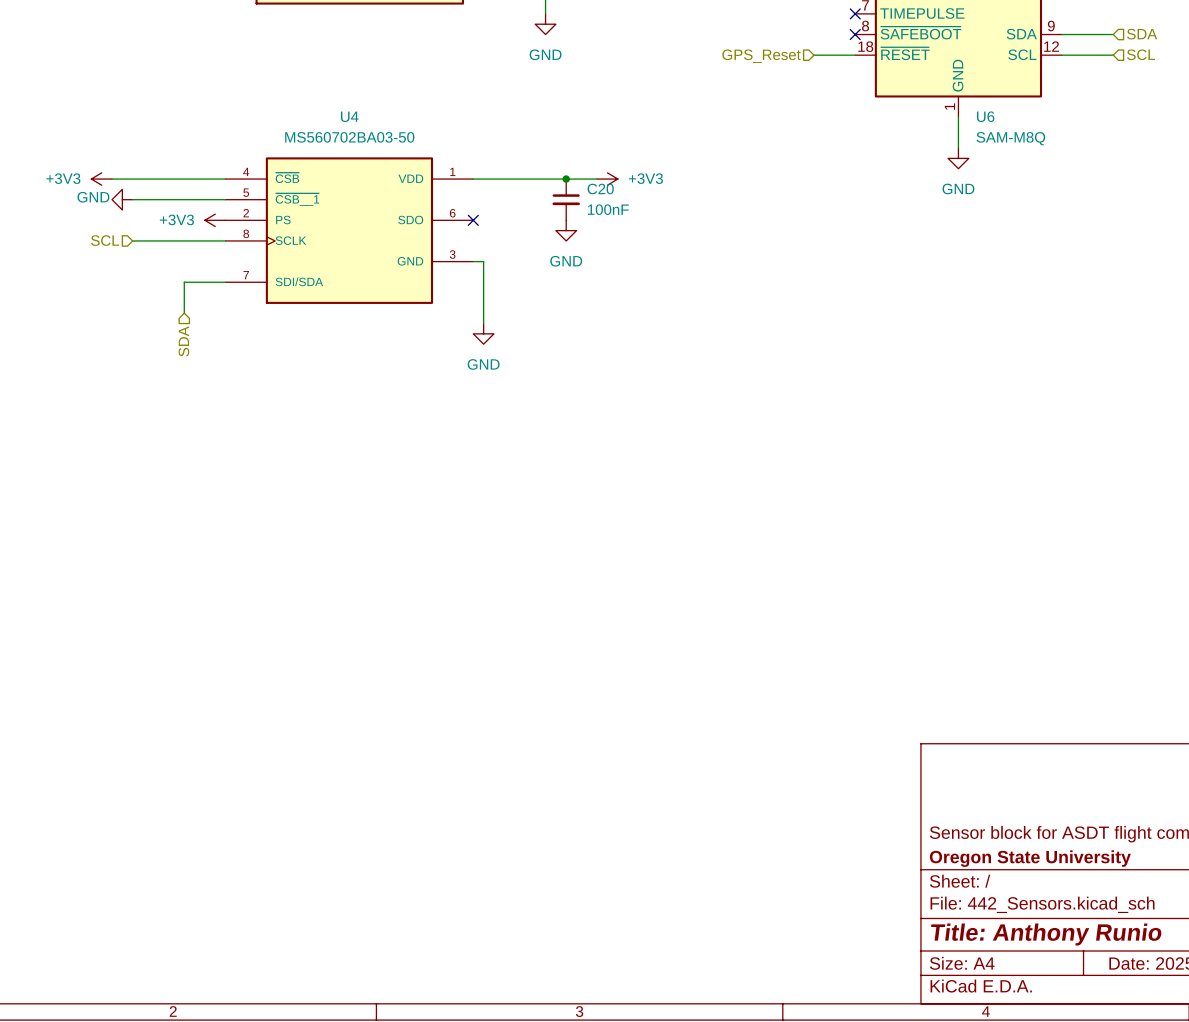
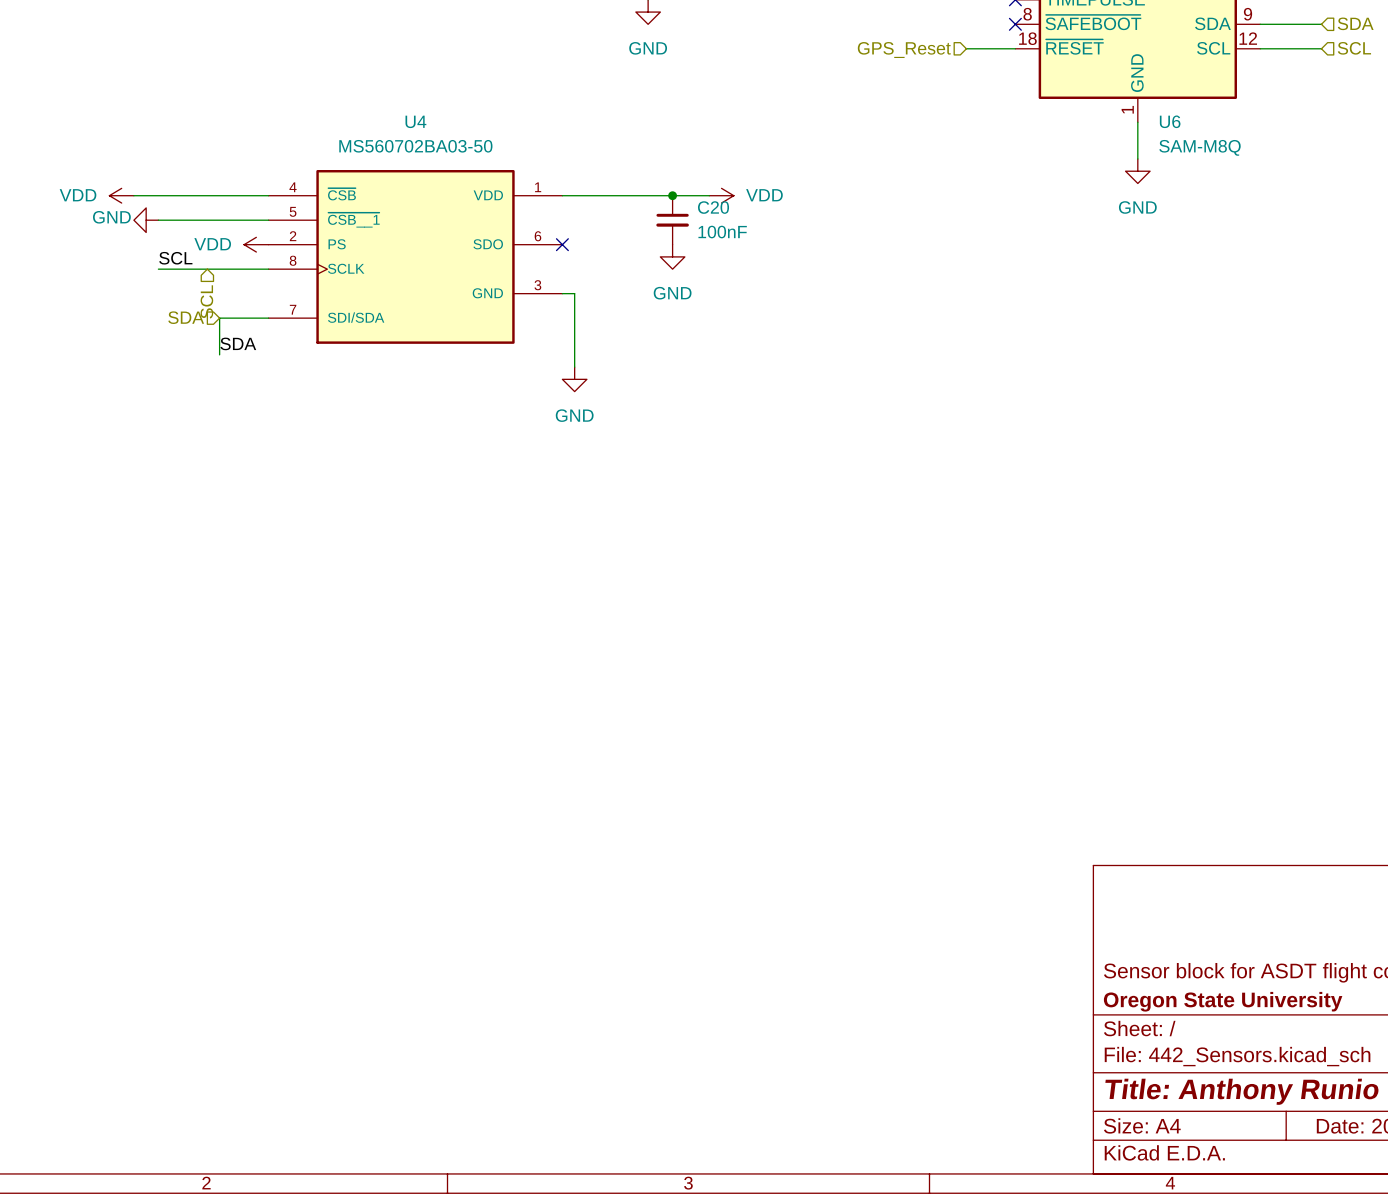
power symbol: +3V3 (101, 179) -> VDD (121, 195)
power symbol: +3V3 (607, 179) -> VDD (721, 195)
power symbol: +3V3 (215, 220) -> VDD (256, 244)
label: none -> SCL (175, 258)
hierarchical label rotation: 0° (105, 240) -> 90° counterclockwise (206, 301)
hierarchical label position: SCL (105, 240) -> SCL (206, 301)
label: none -> SDA (238, 343)
hierarchical label rotation: 0° (183, 341) -> 90° clockwise (186, 317)
hierarchical label position: SDA (183, 341) -> SDA (186, 317)

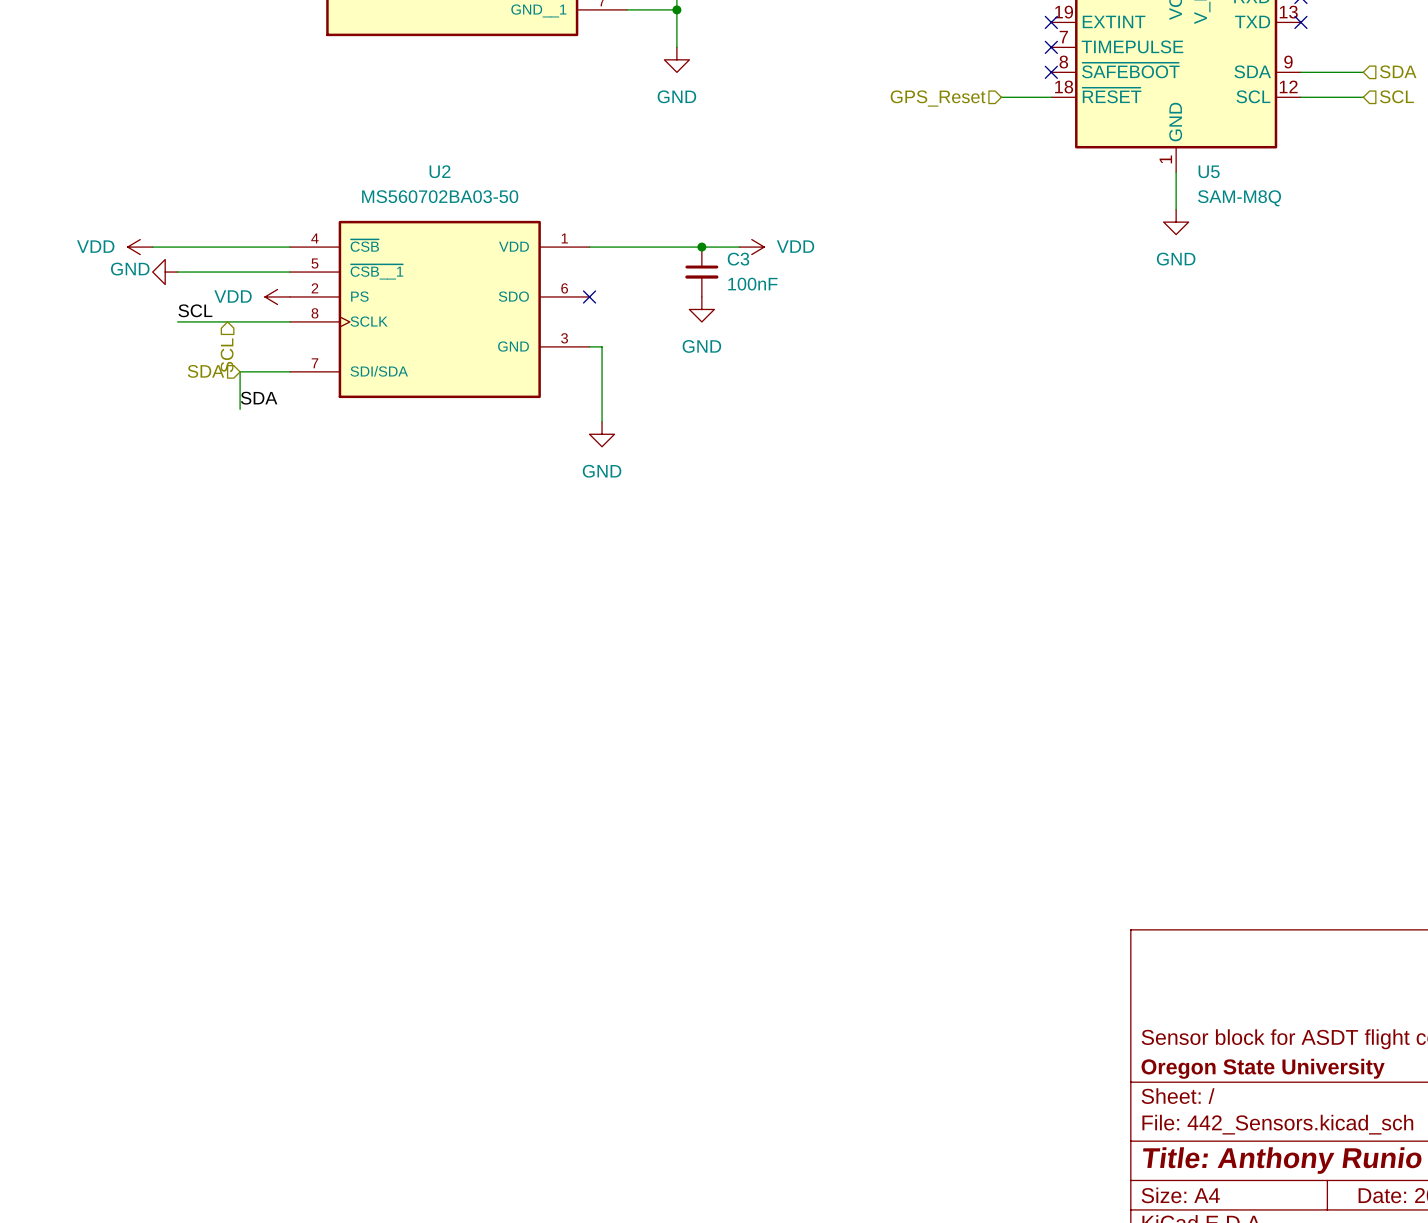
U4 name: U4 (415, 121) -> U2 (440, 171)
U6 name: U6 (1170, 121) -> U5 (1209, 171)
C20 name: C20 (713, 207) -> C3 (738, 259)

